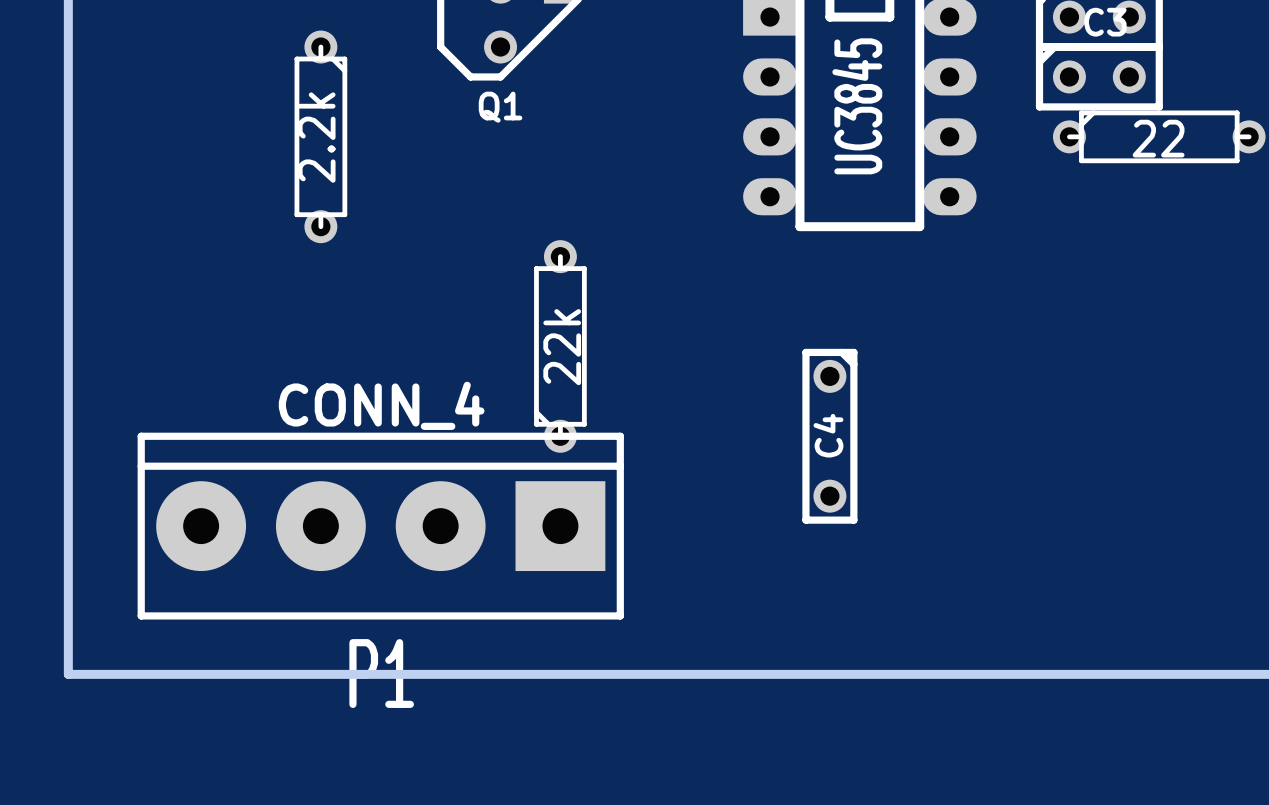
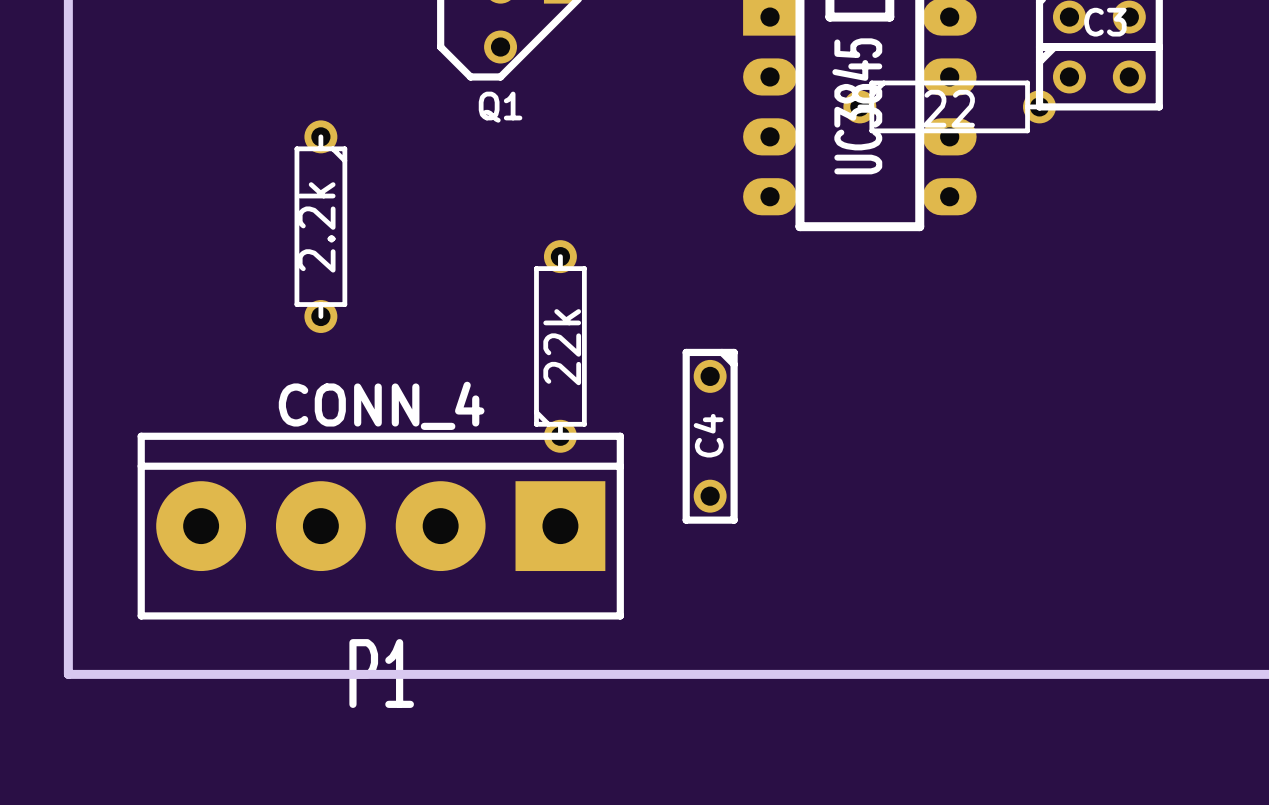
part position: (320, 136) -> (320, 226)
part position: (1159, 136) -> (949, 106)
C4 position: (829, 436) -> (710, 436)

